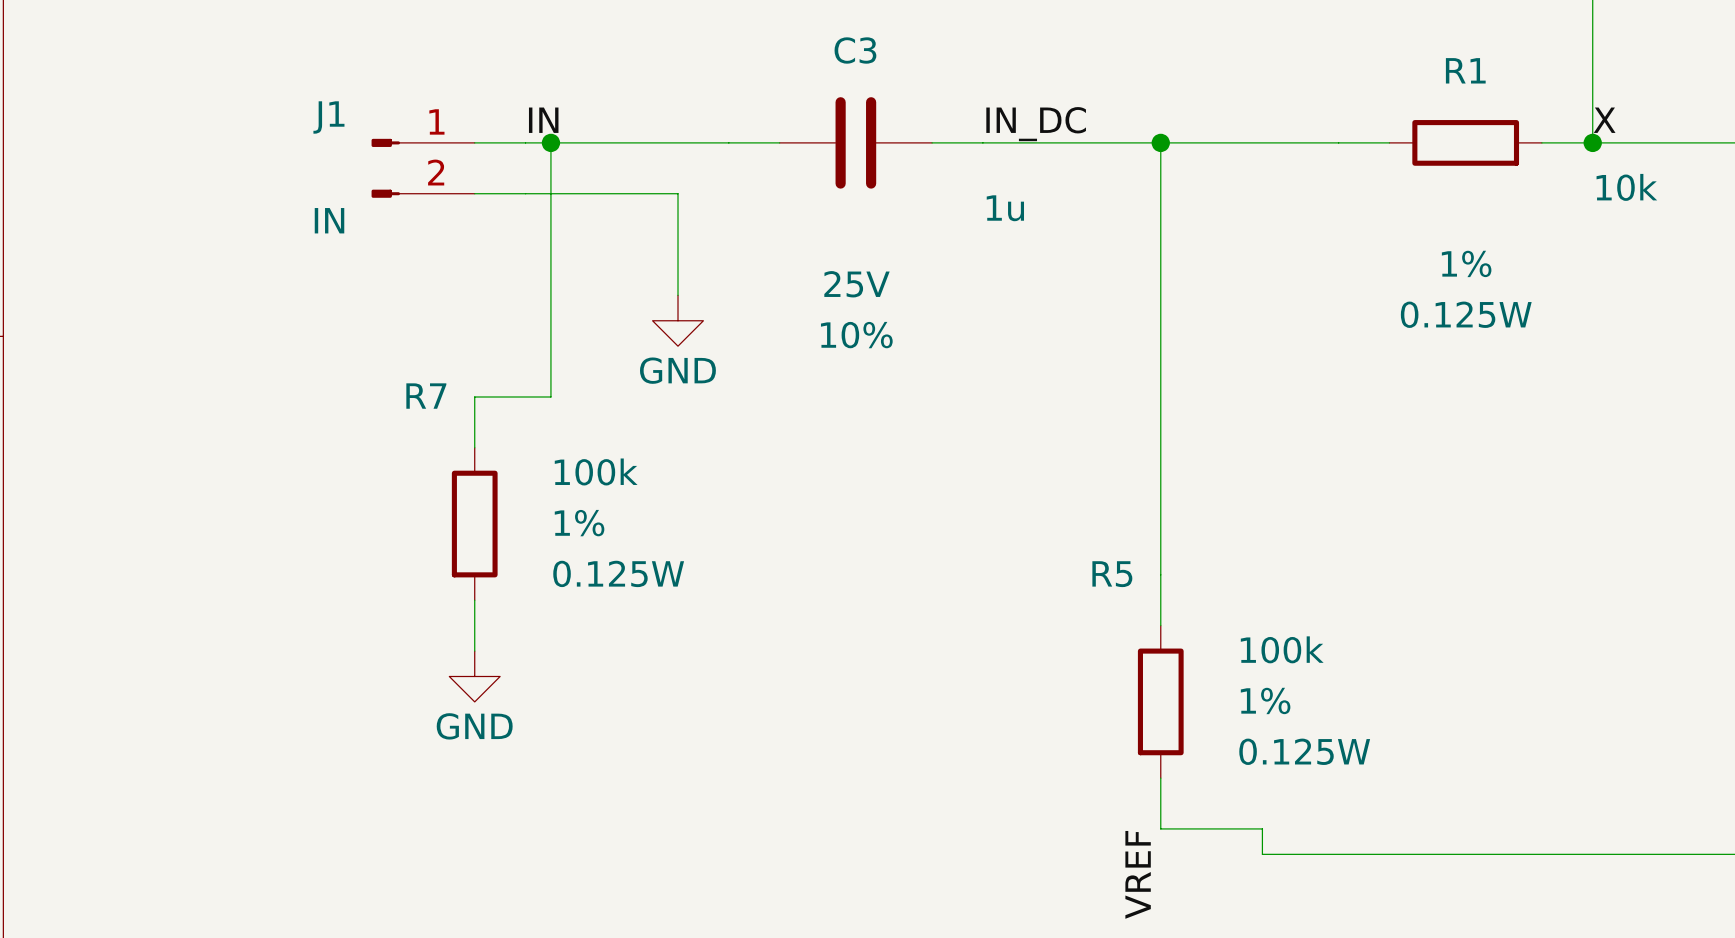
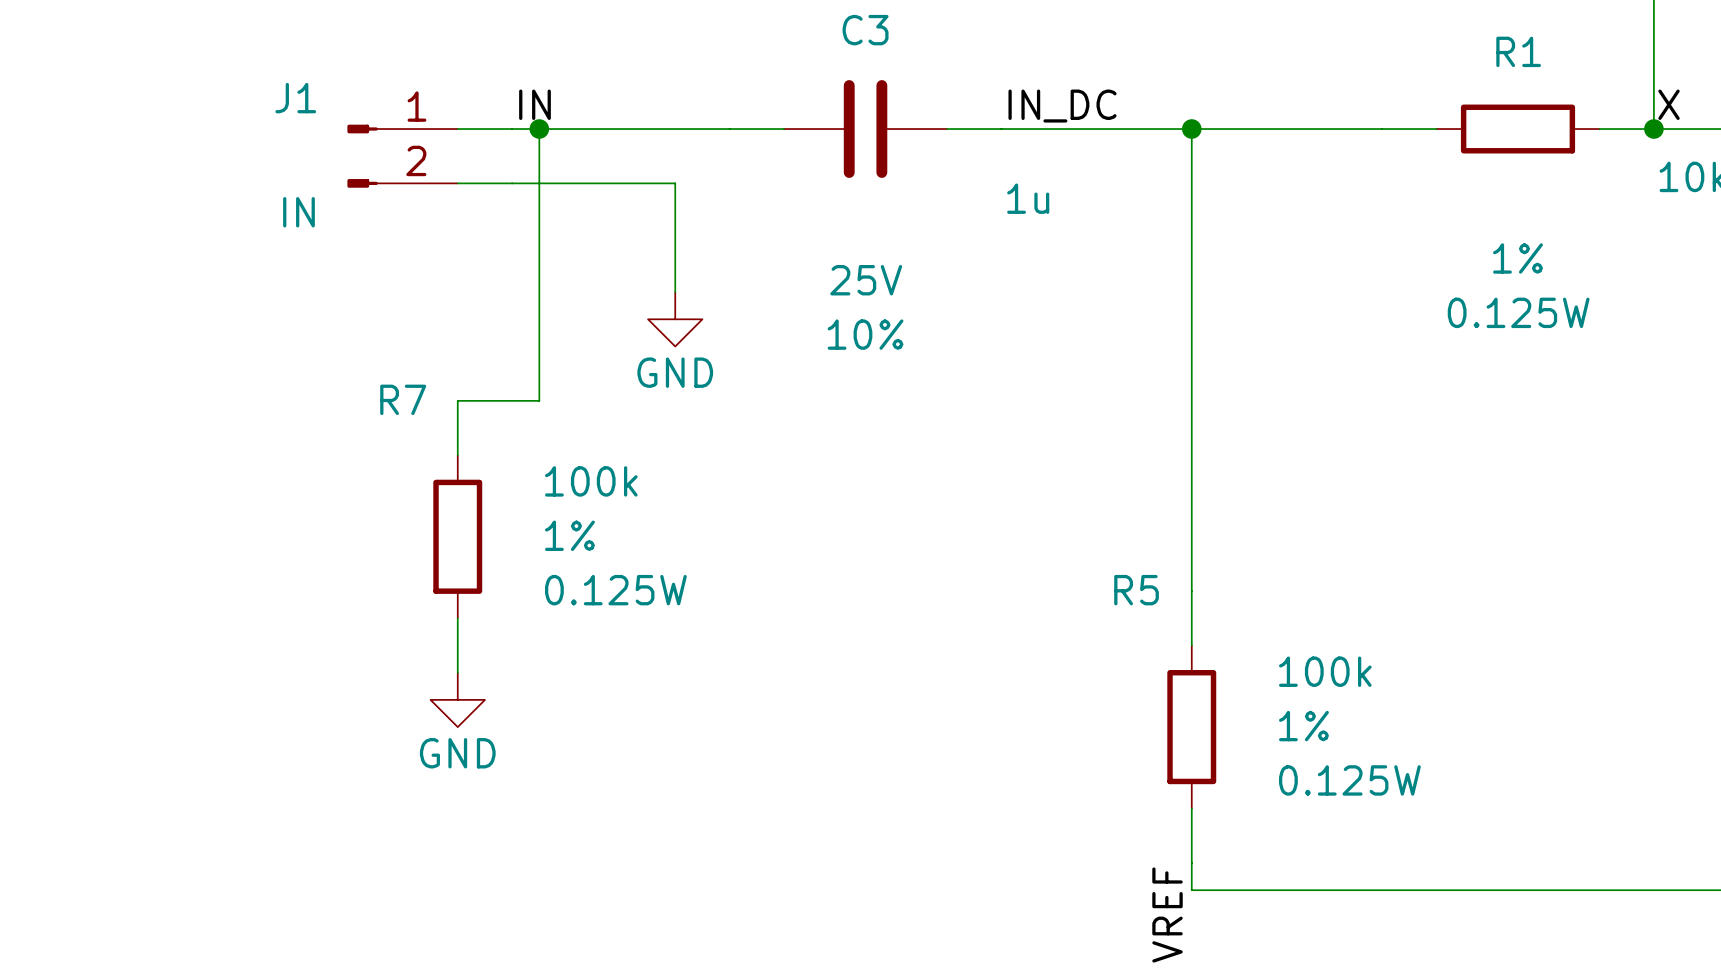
wire: (1160, 828) (1262, 828) (1262, 854) -> (1191, 863) (1191, 890) (1300, 890)

